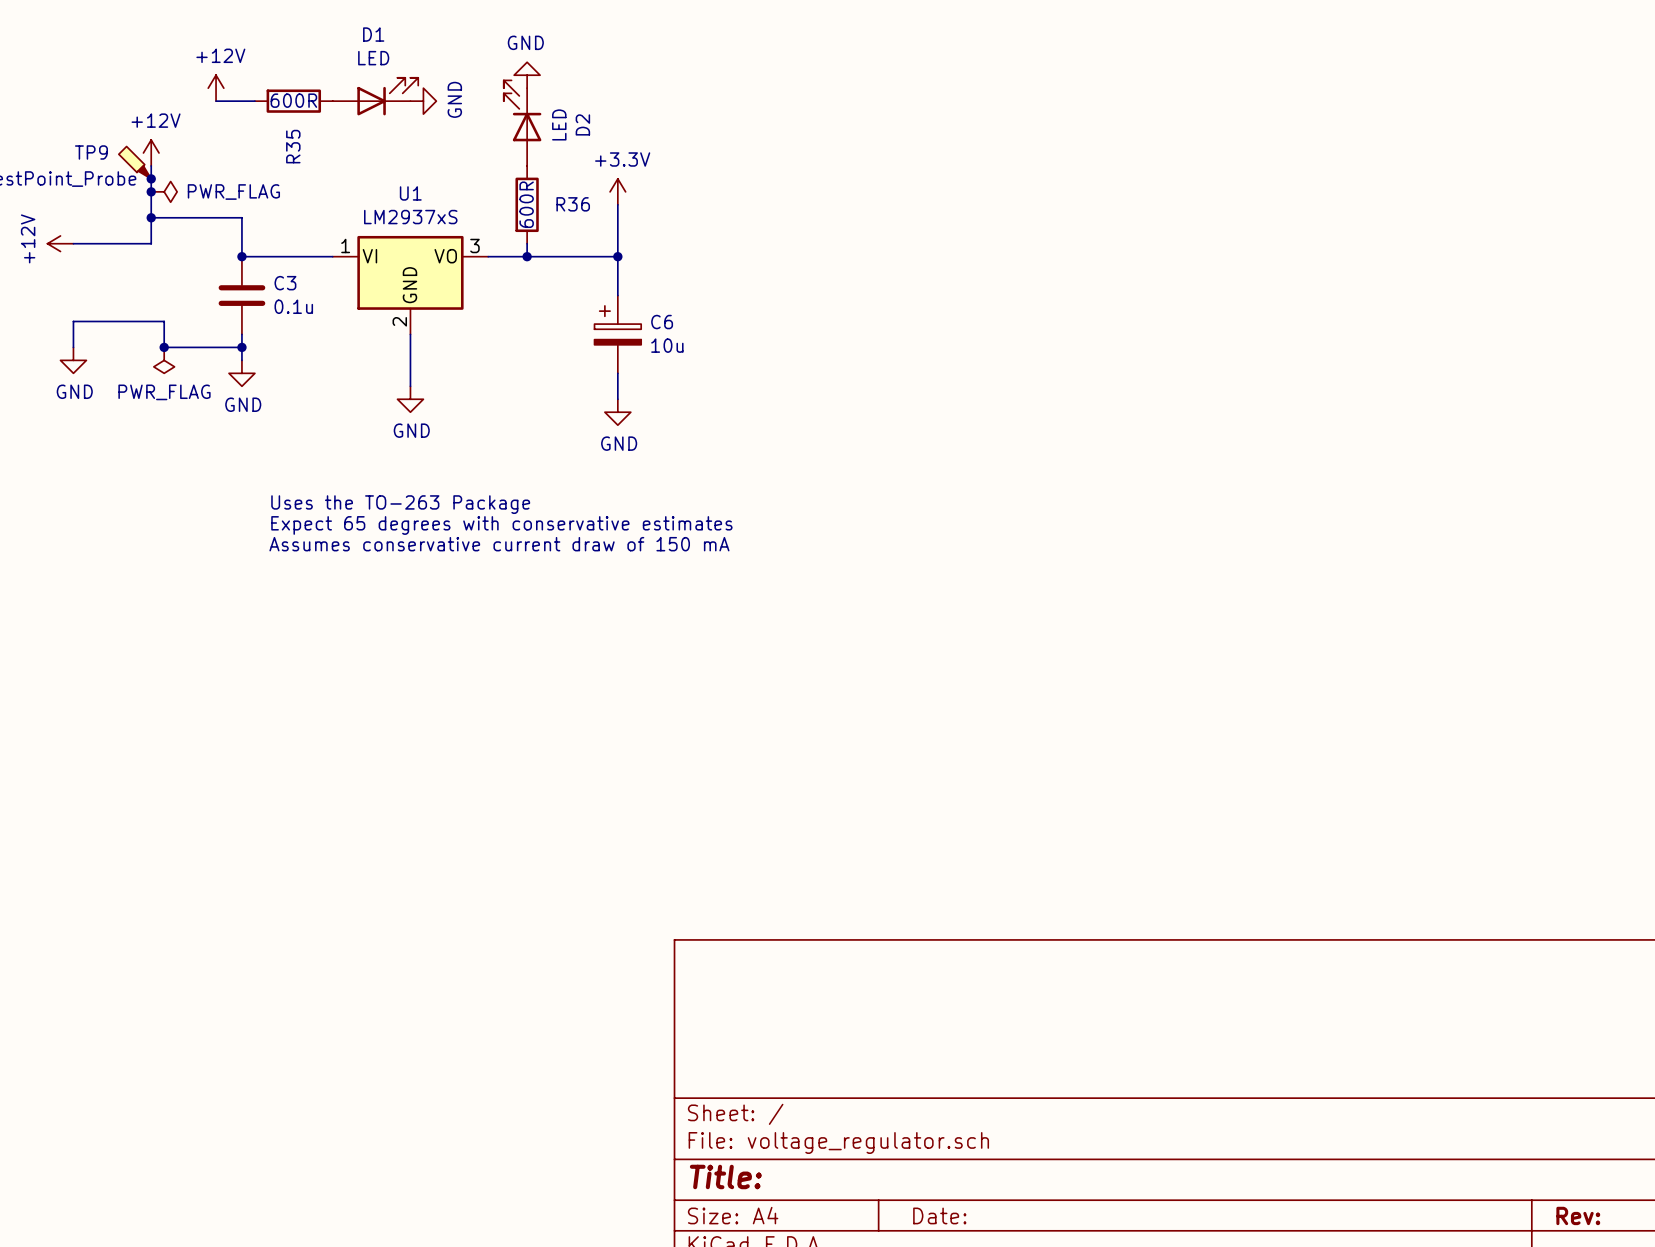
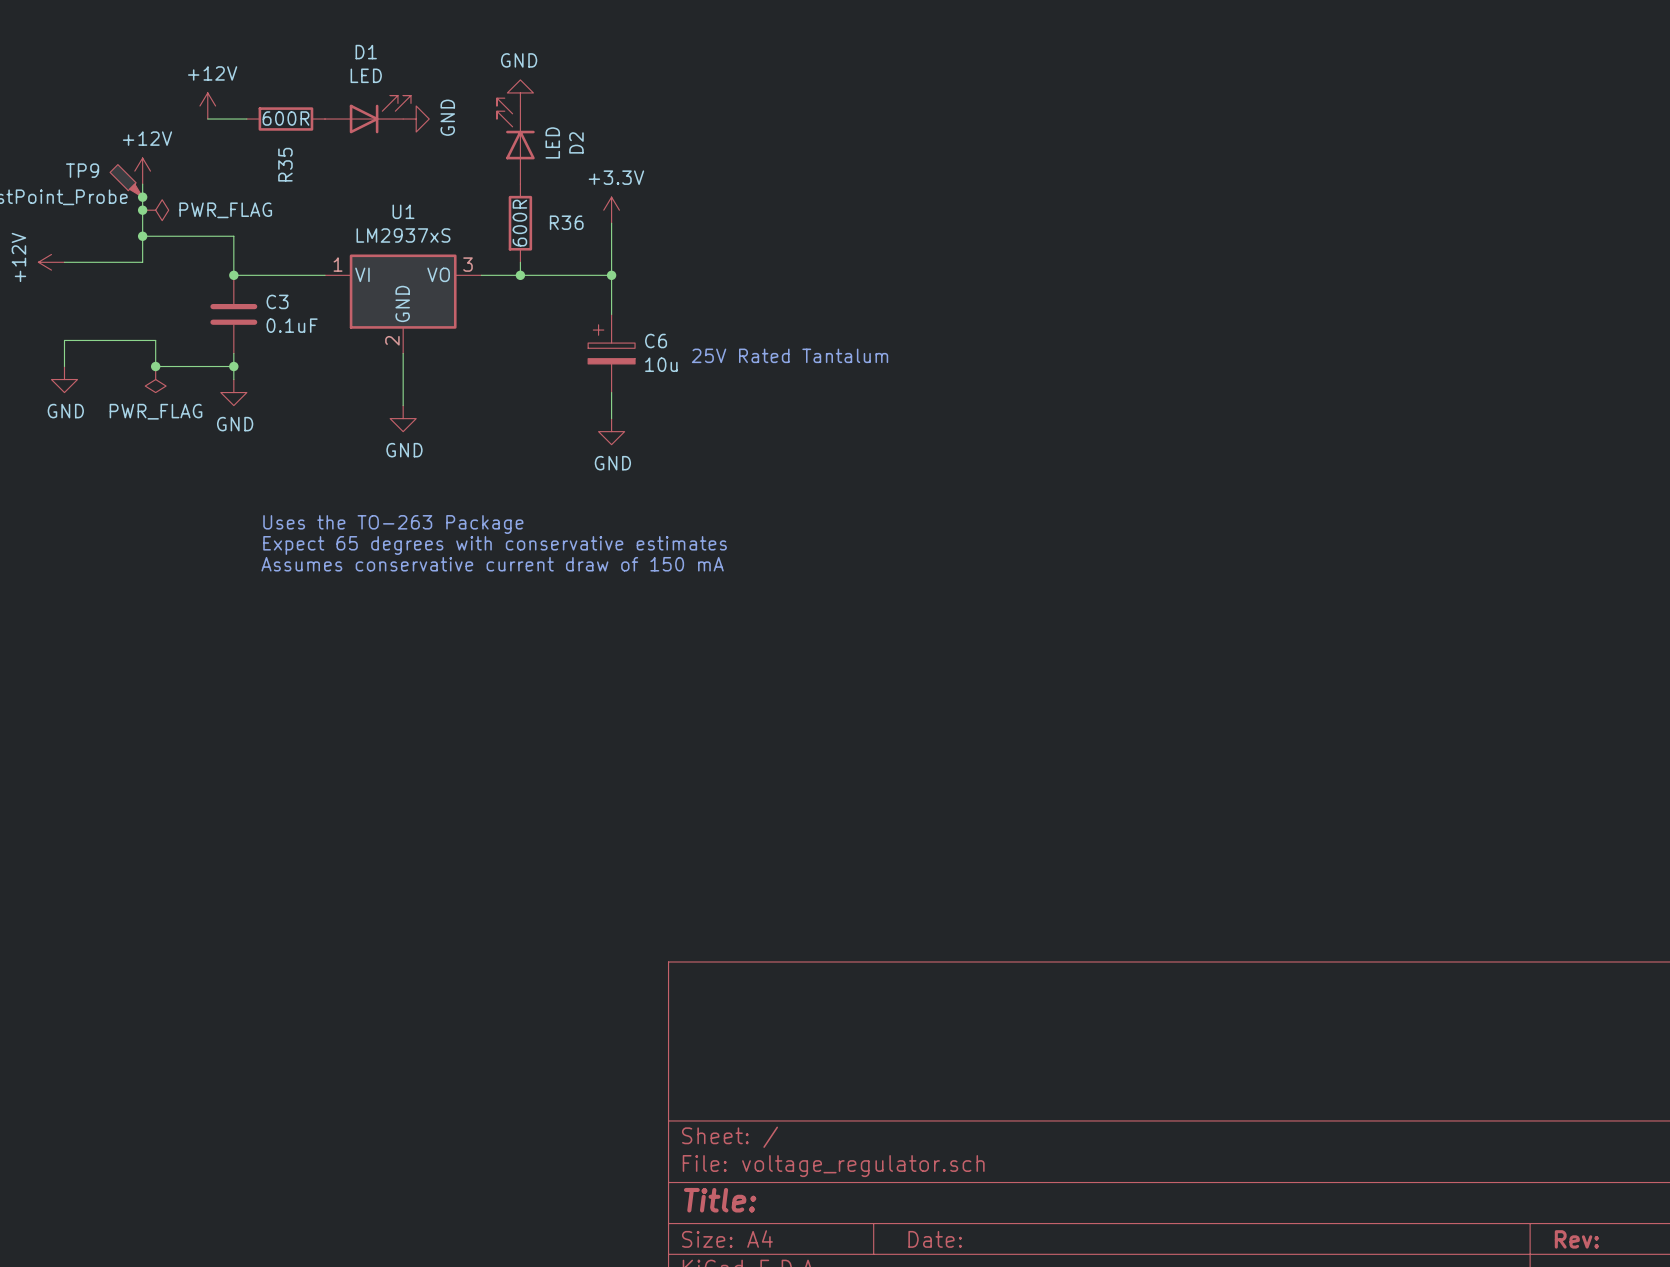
C3 value: 0.1u (293, 306) -> 0.1uF (292, 325)
text: none -> 25V Rated Tantalum (790, 355)

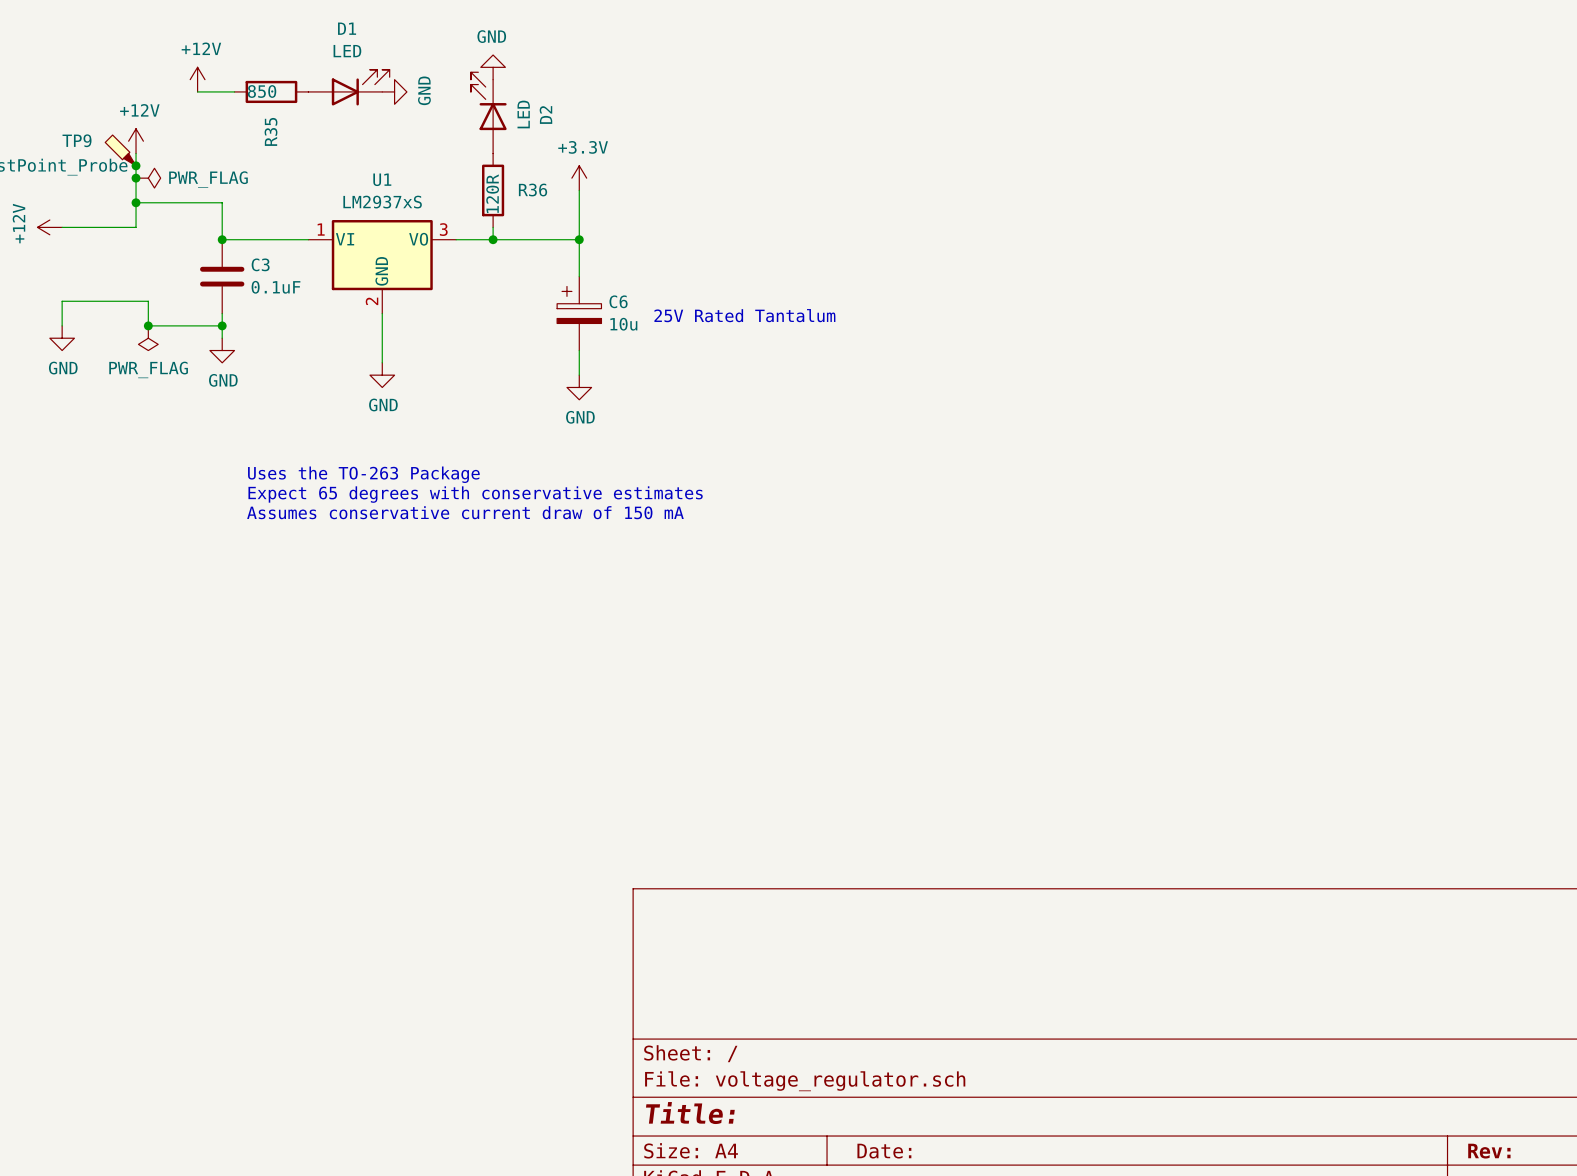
R35 value: 600R (286, 118) -> 850 (262, 91)
R36 value: 600R (519, 223) -> 120R (492, 193)

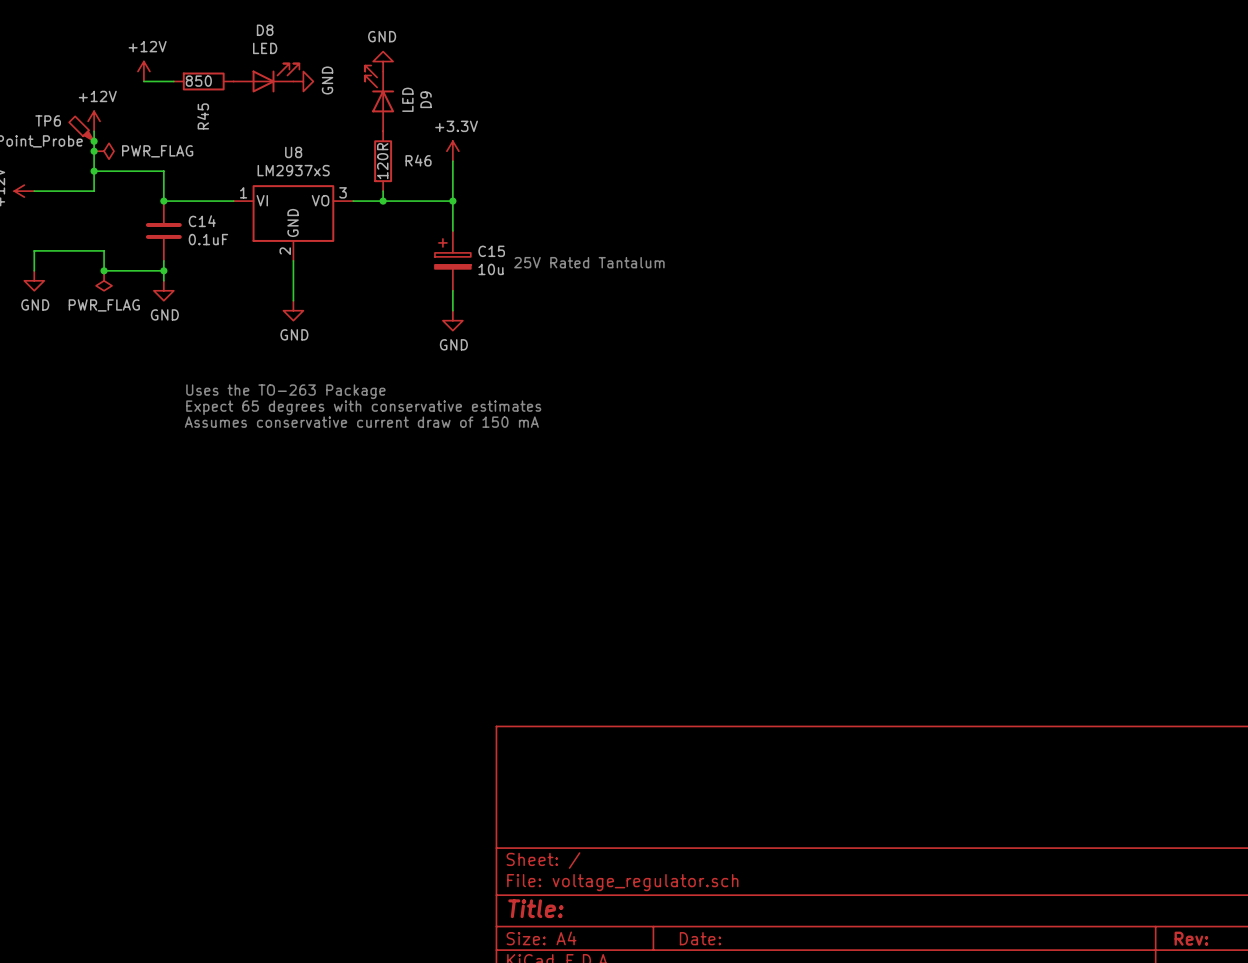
D1 name: D1 (347, 28) -> D8 (265, 30)
D2 name: D2 (545, 115) -> D9 (426, 99)
R35 name: R35 (271, 131) -> R45 (203, 116)
TP9 name: TP9 (77, 140) -> TP6 (48, 120)
U1 name: U1 (382, 179) -> U8 (293, 152)
R36 name: R36 (533, 190) -> R46 (418, 160)
C3 name: C3 (260, 264) -> C14 (202, 221)
C6 name: C6 (618, 301) -> C15 (491, 251)

